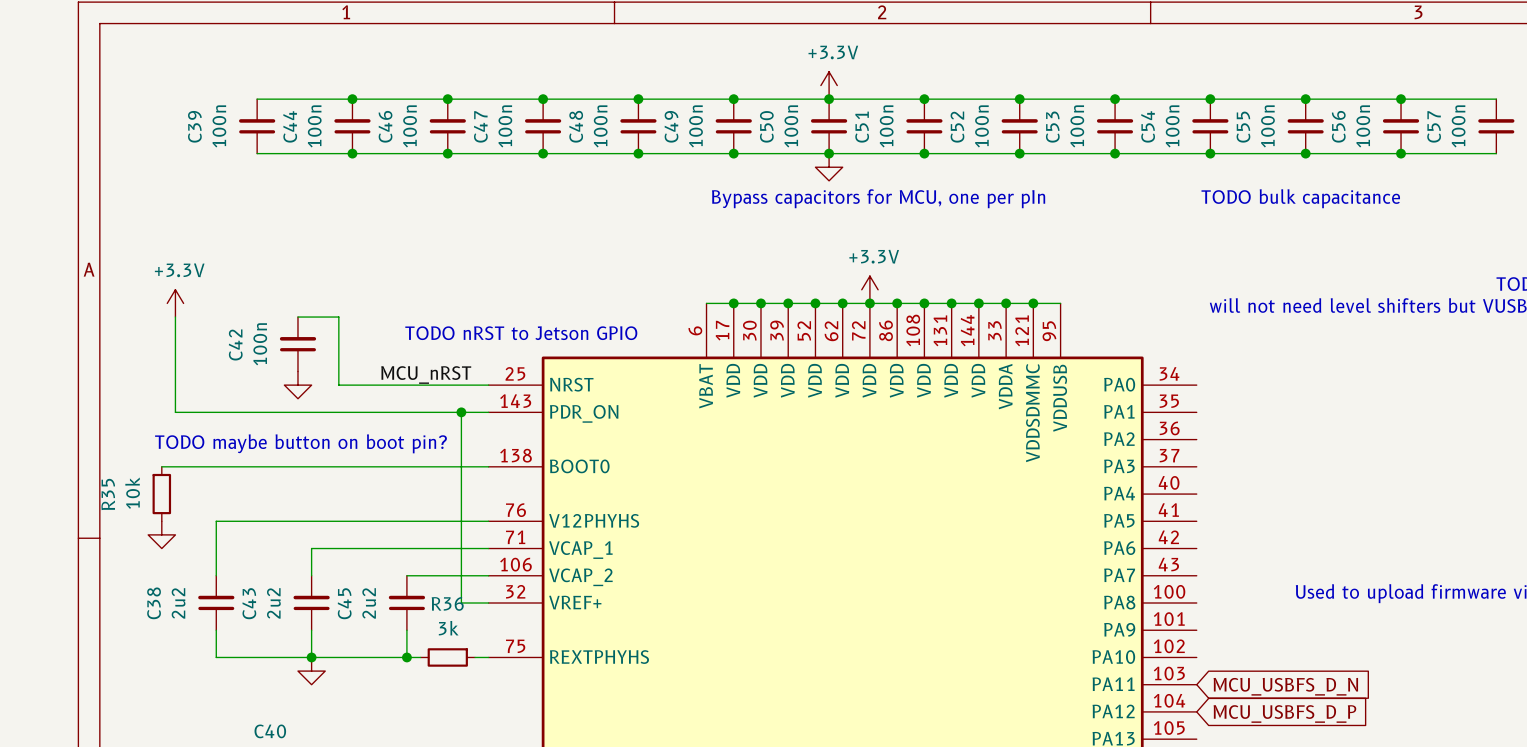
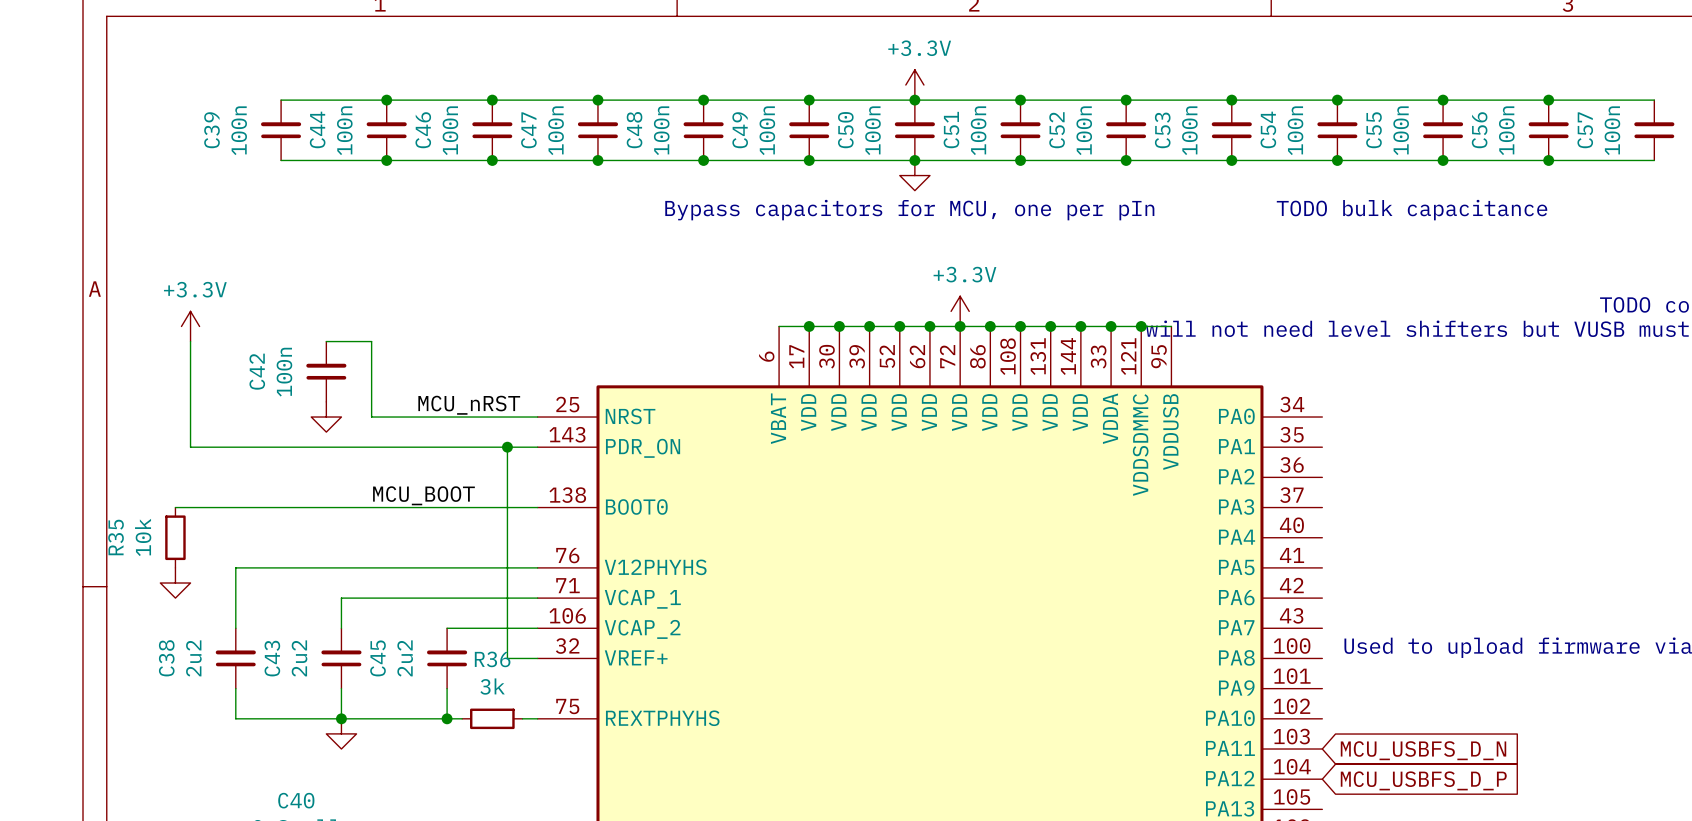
text: TODO nRST to Jetson GPIO (521, 333) -> none
text: TODO maybe button on boot pin? (300, 443) -> none
label: none -> MCU_BOOT (423, 495)

